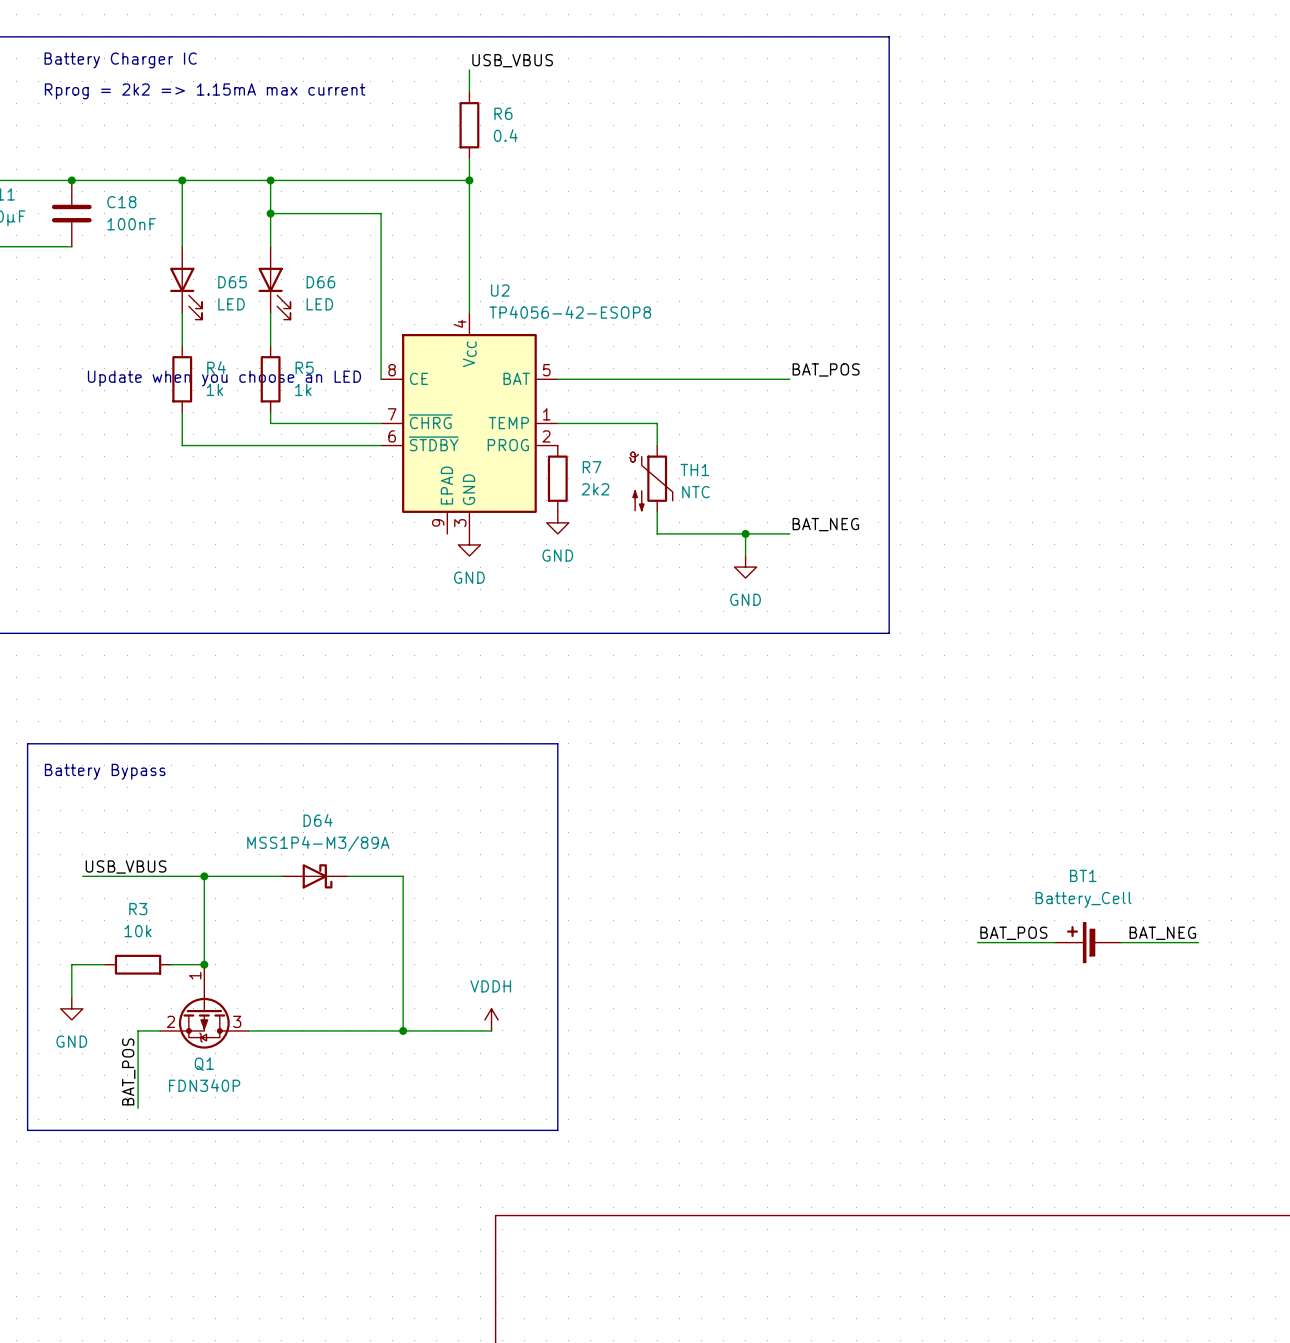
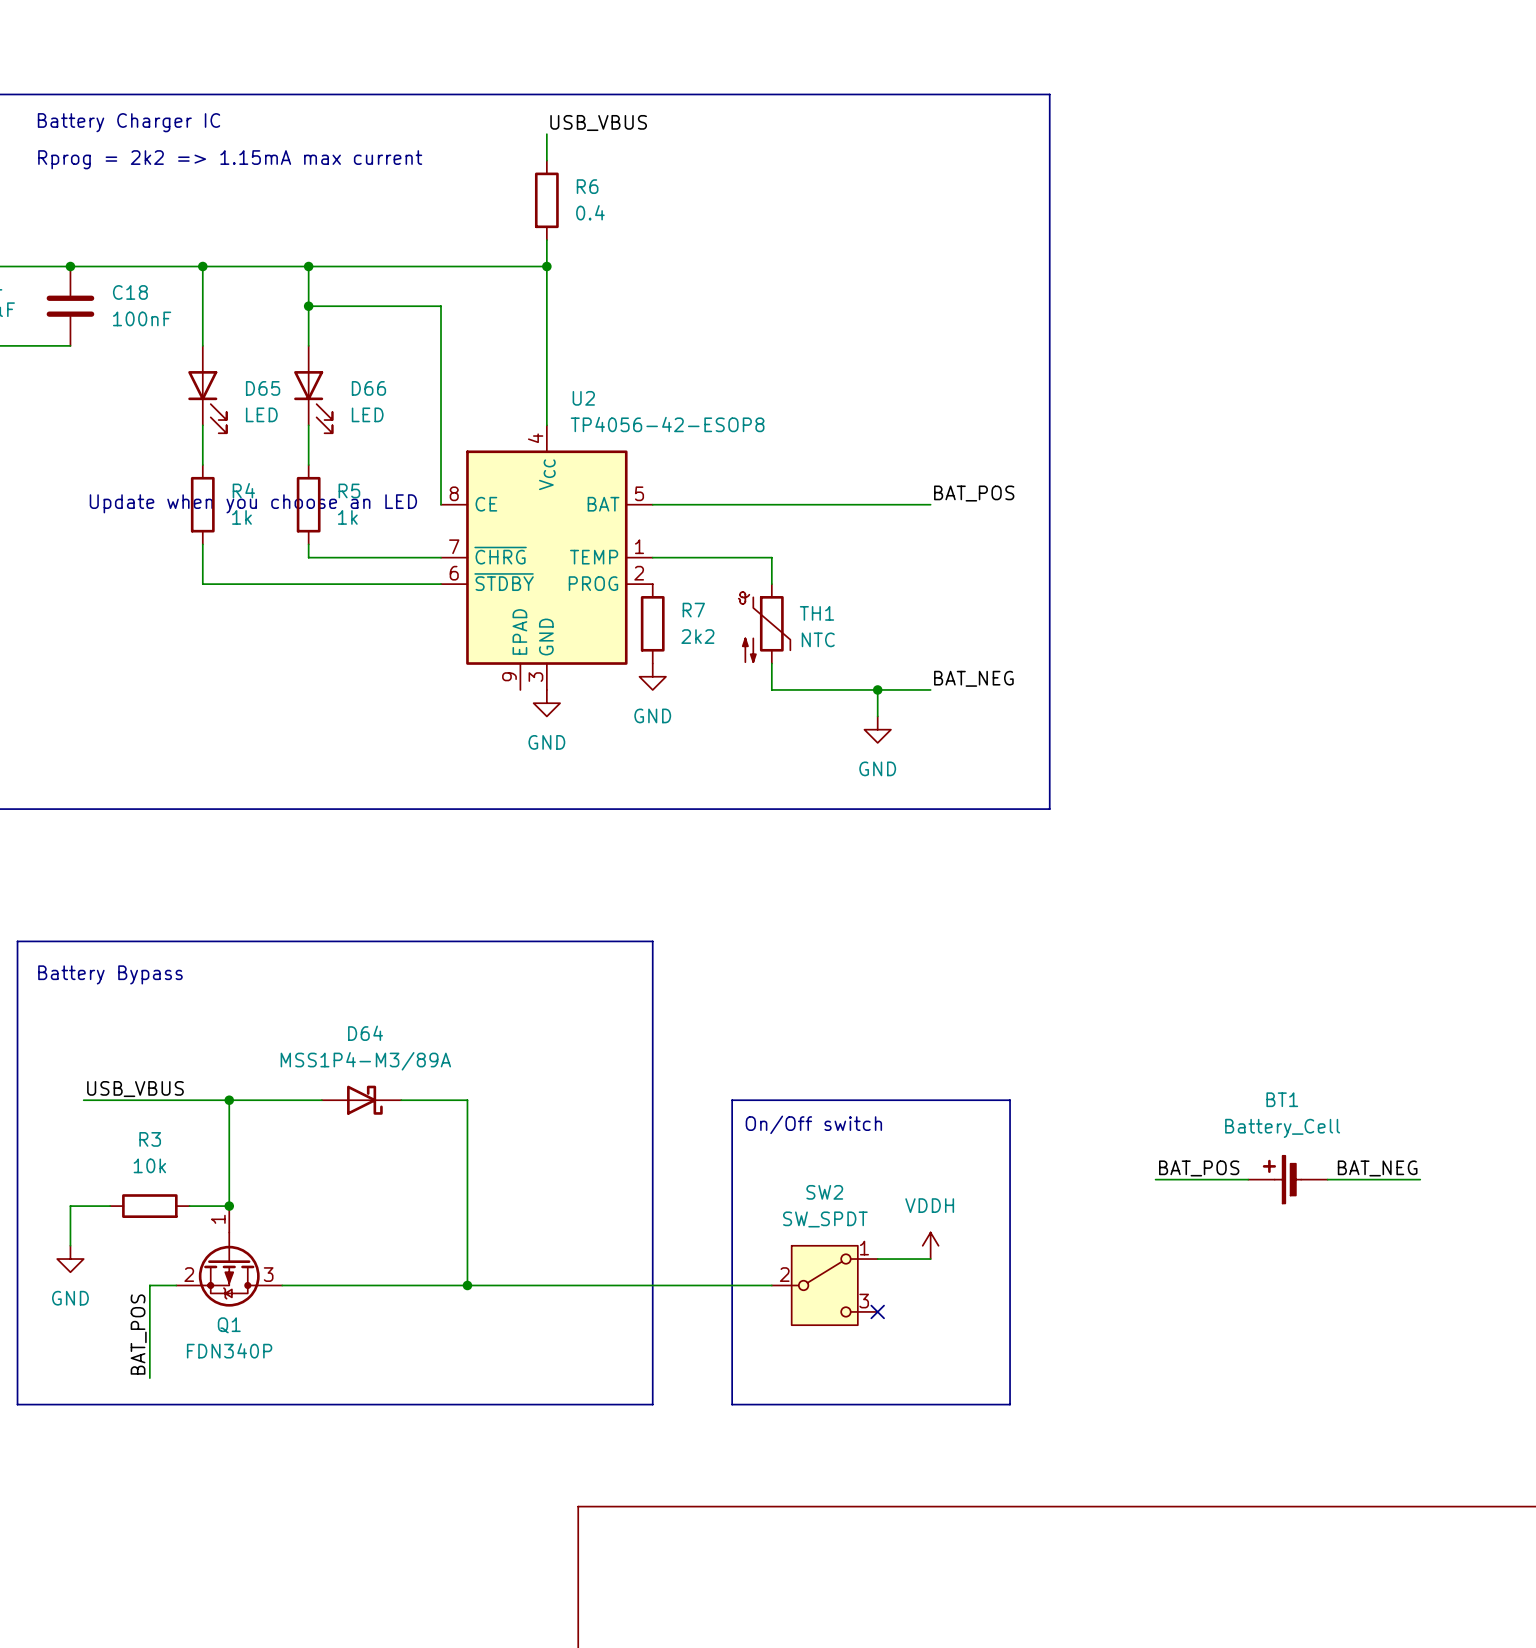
line: none -> (732, 1100) (1010, 1100) (1010, 1404) (732, 1404) (732, 1100)
text: none -> On/Off switch (813, 1124)
power symbol: none -> VDDH (930, 1245)
wire: none -> (877, 1259) (930, 1259)
power symbol: VDDH (491, 1019) -> none
wire: none -> (573, 1285) (771, 1285)
SW2: none -> SW_SPDT (824, 1285)
no-connect mark: none -> (877, 1311)

